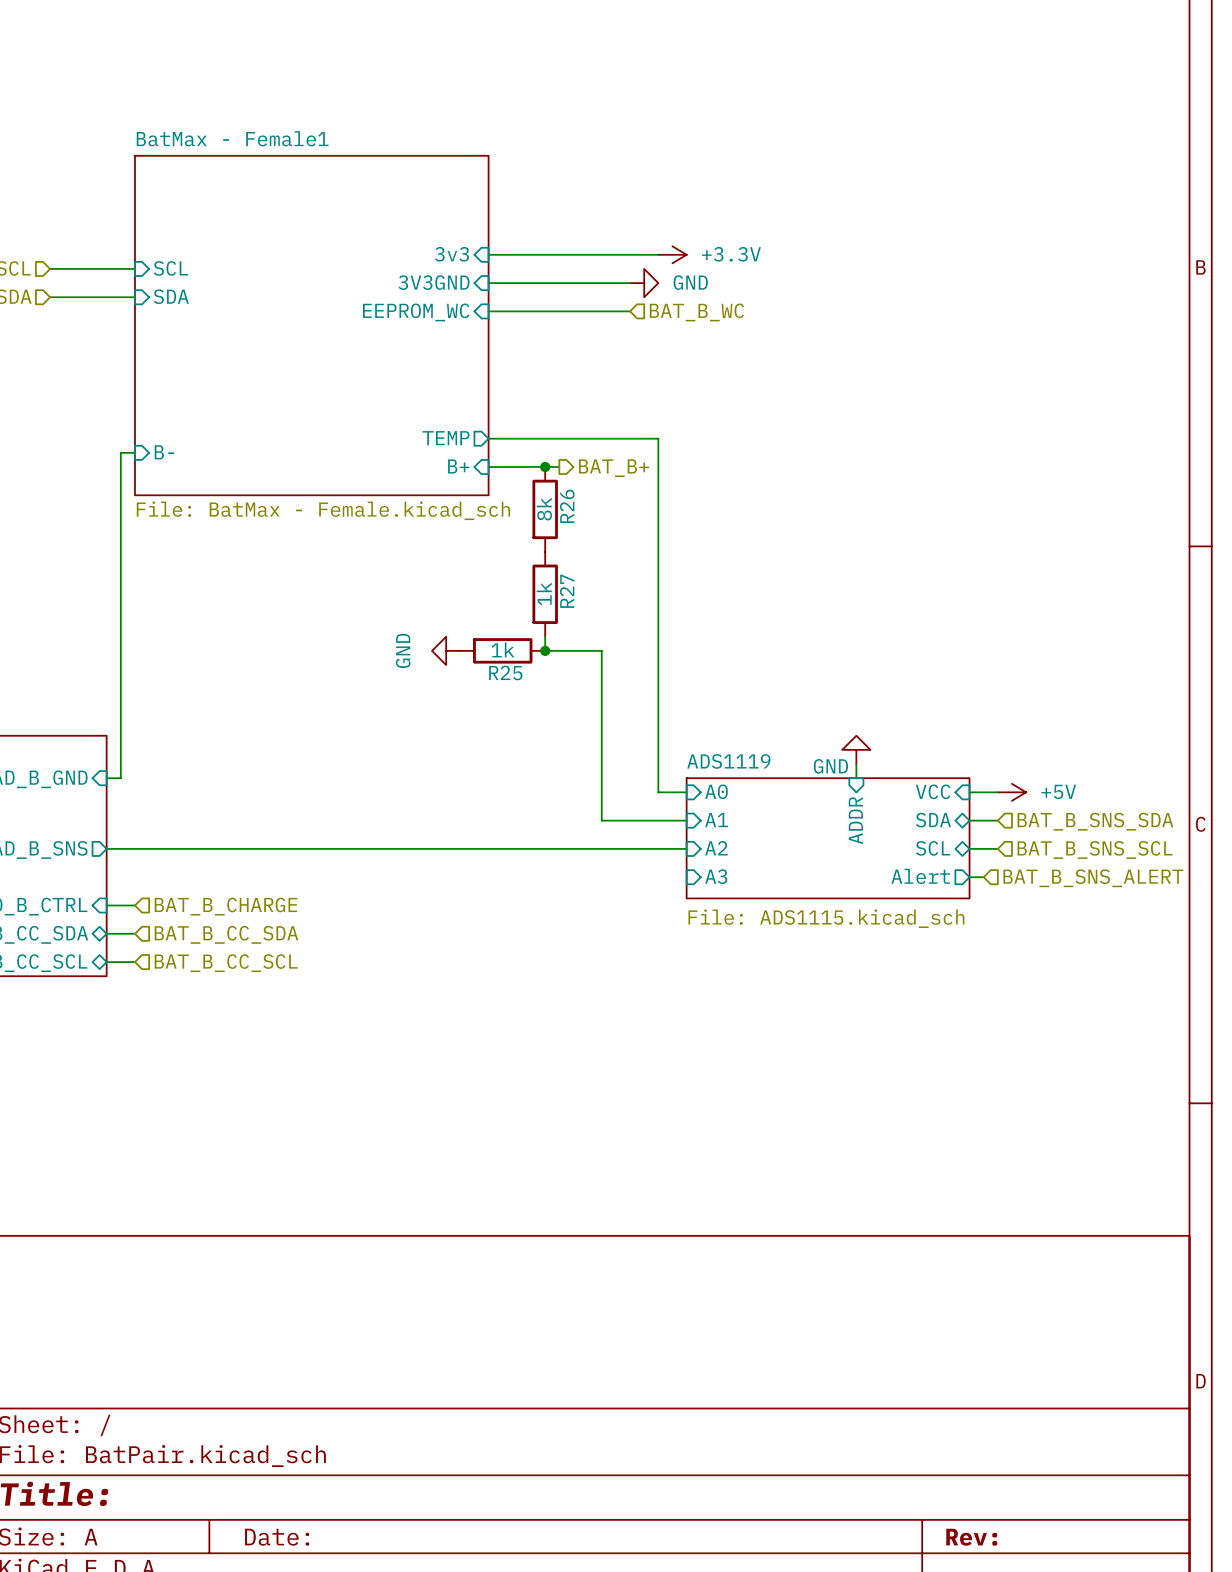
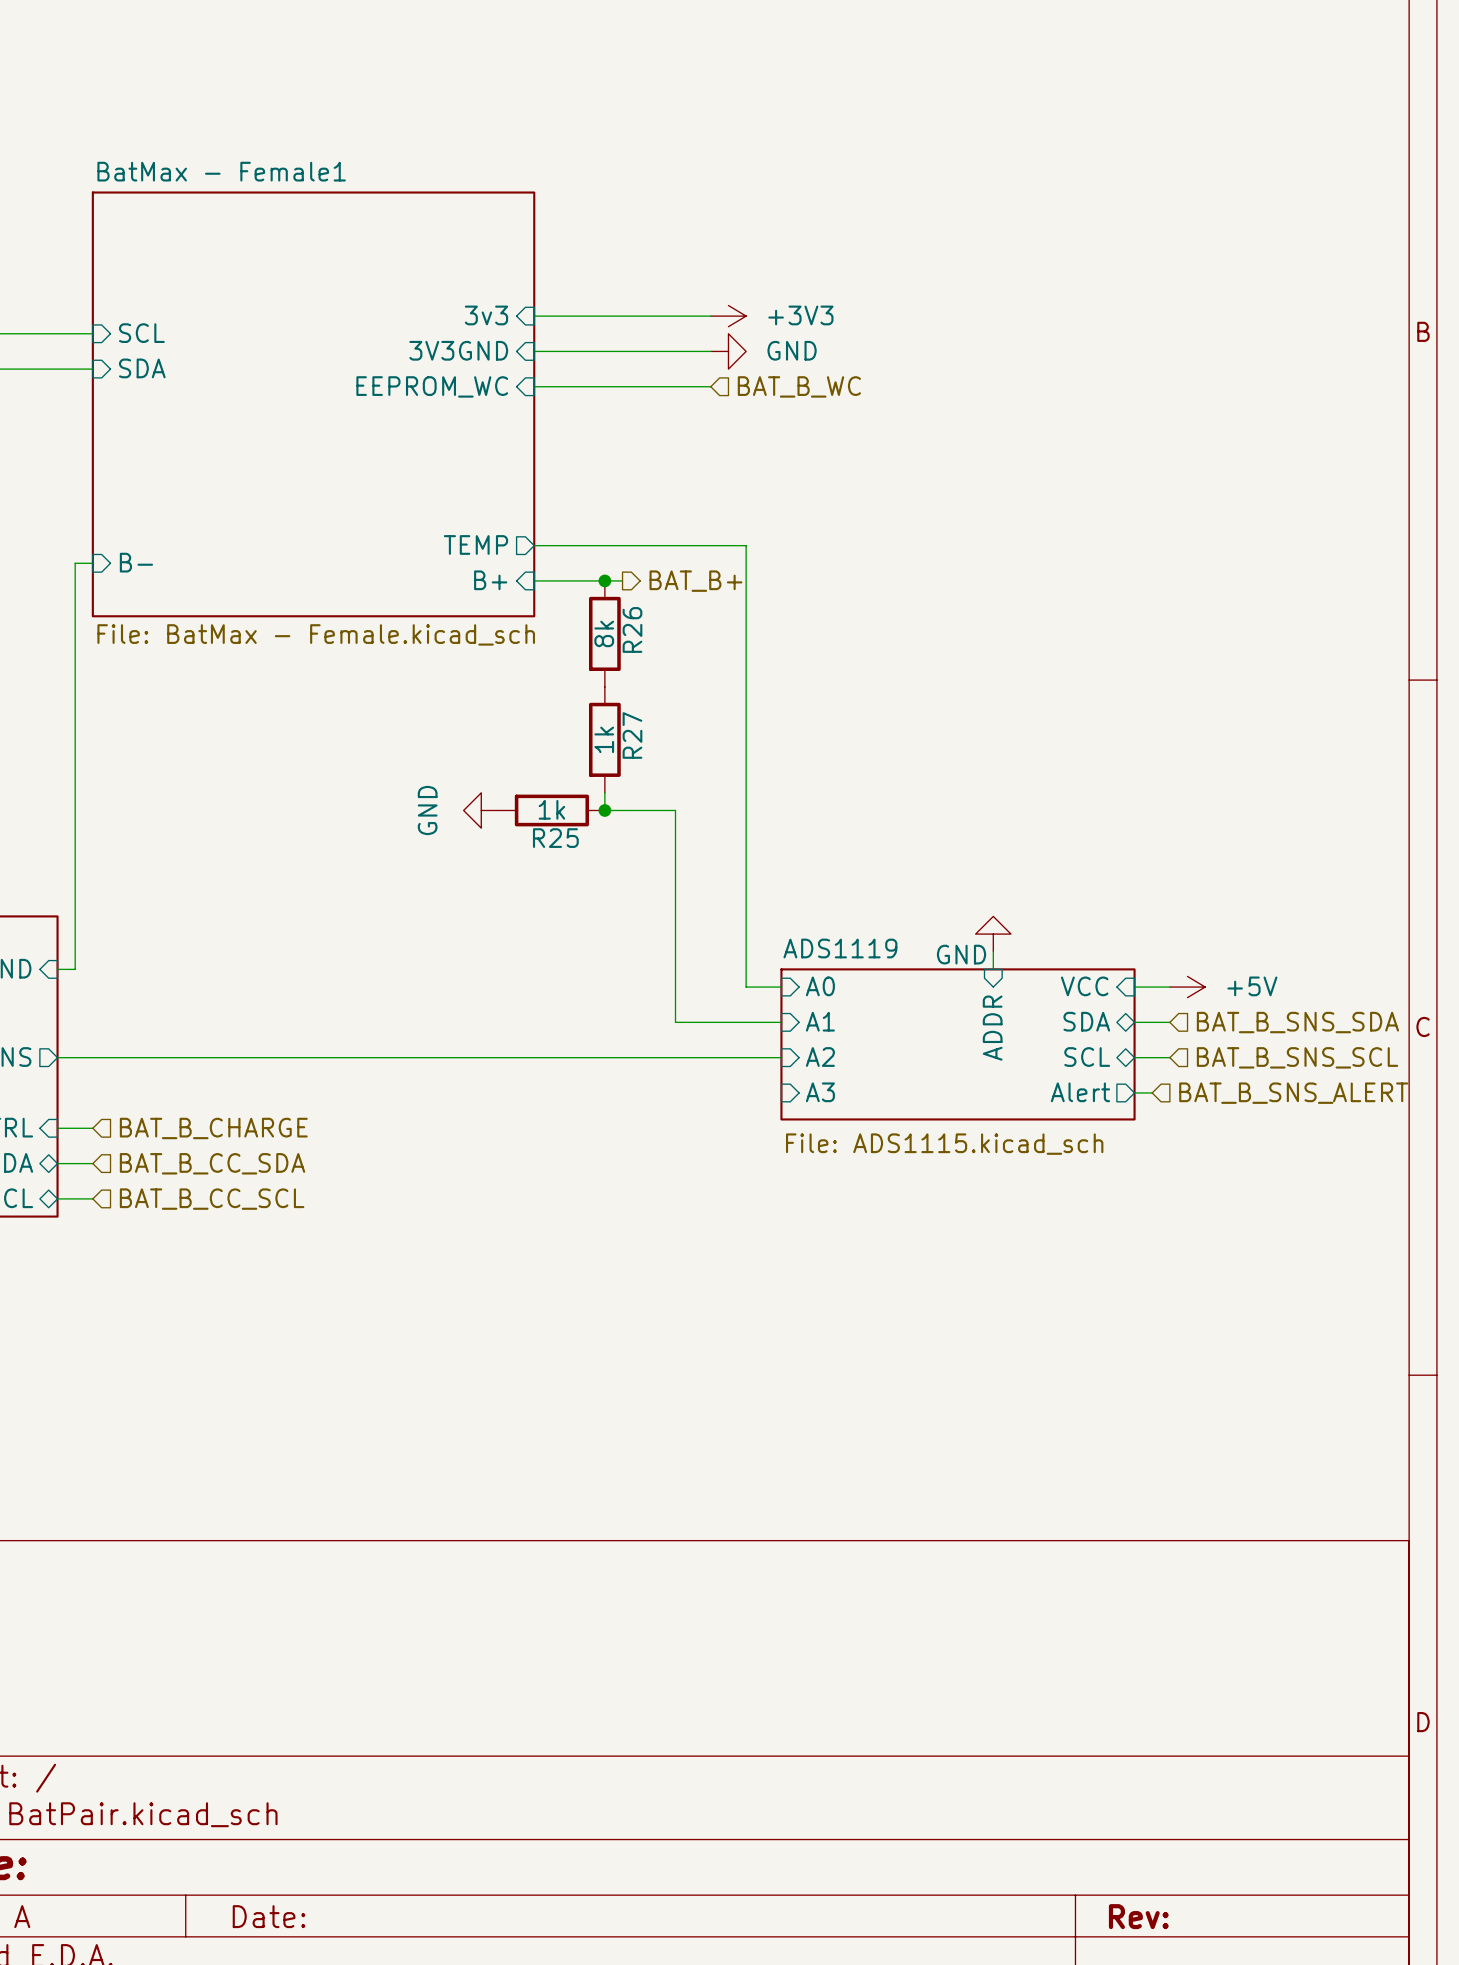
power symbol: none -> +3V3 (728, 316)
power symbol: +3.3V (672, 254) -> none

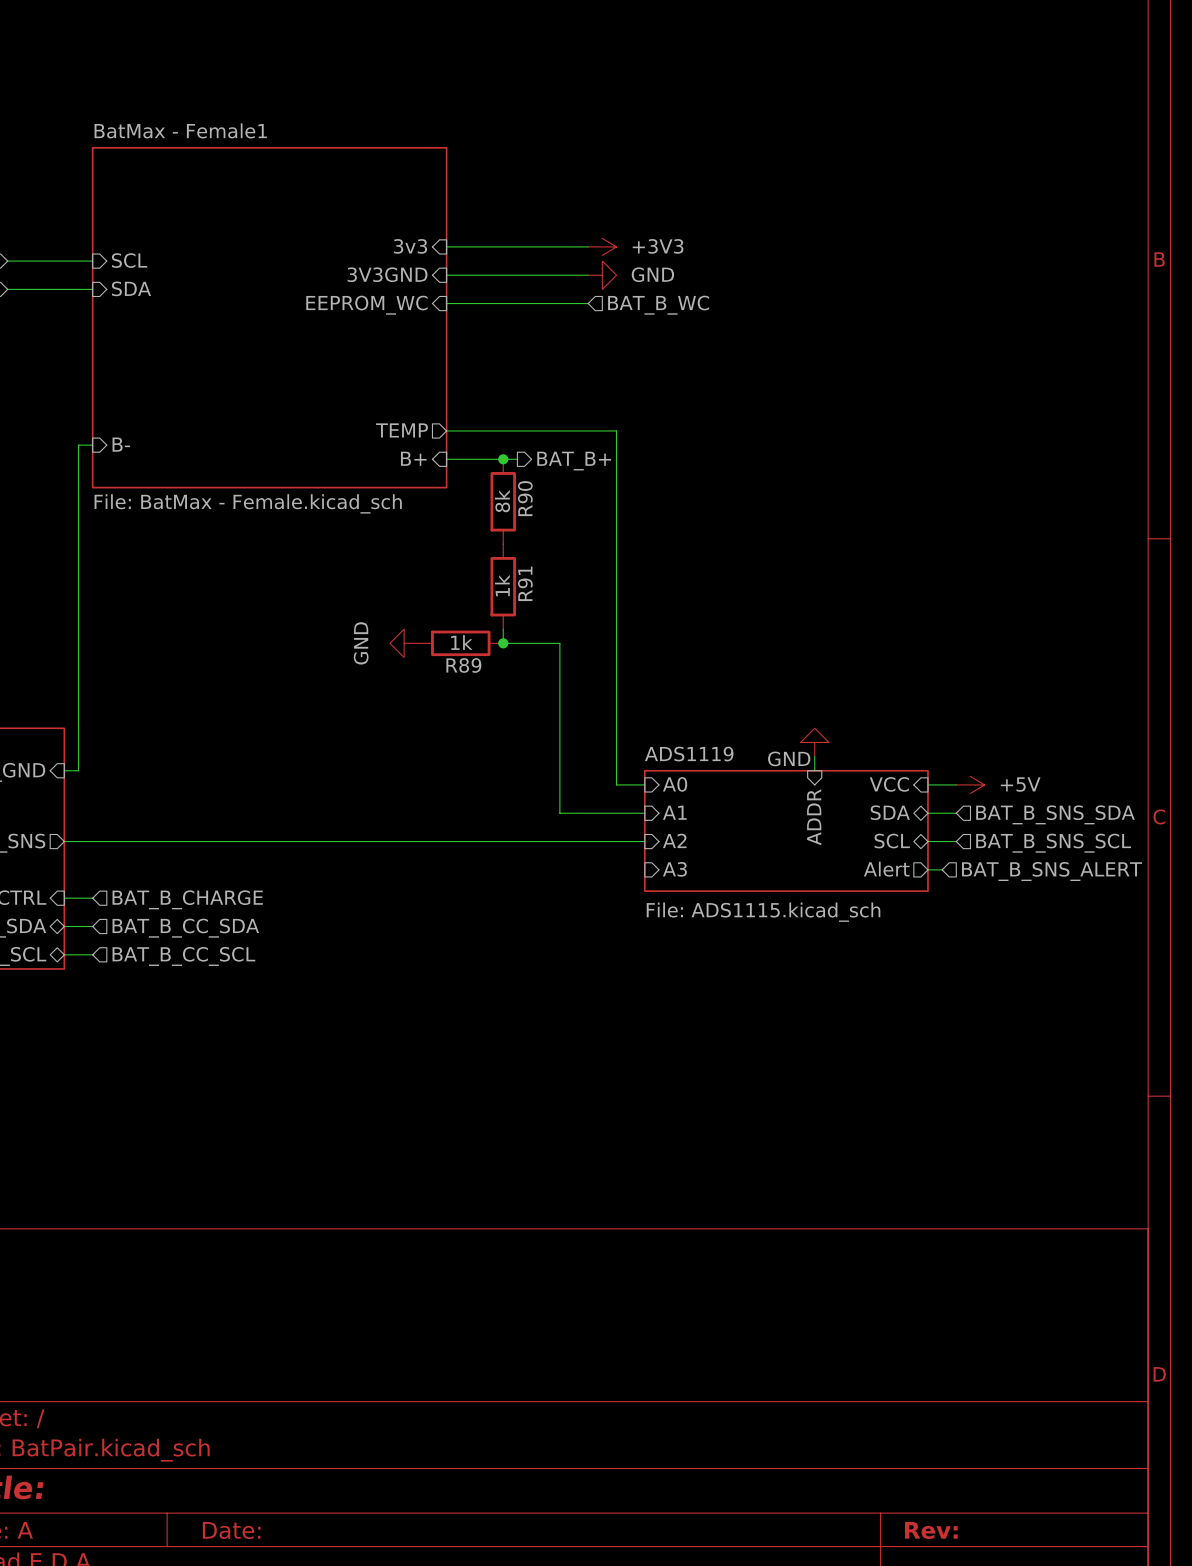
R26 name: R26 (632, 629) -> R90 (525, 498)
R27 name: R27 (632, 735) -> R91 (525, 583)
R25 name: R25 (555, 838) -> R89 (463, 665)

